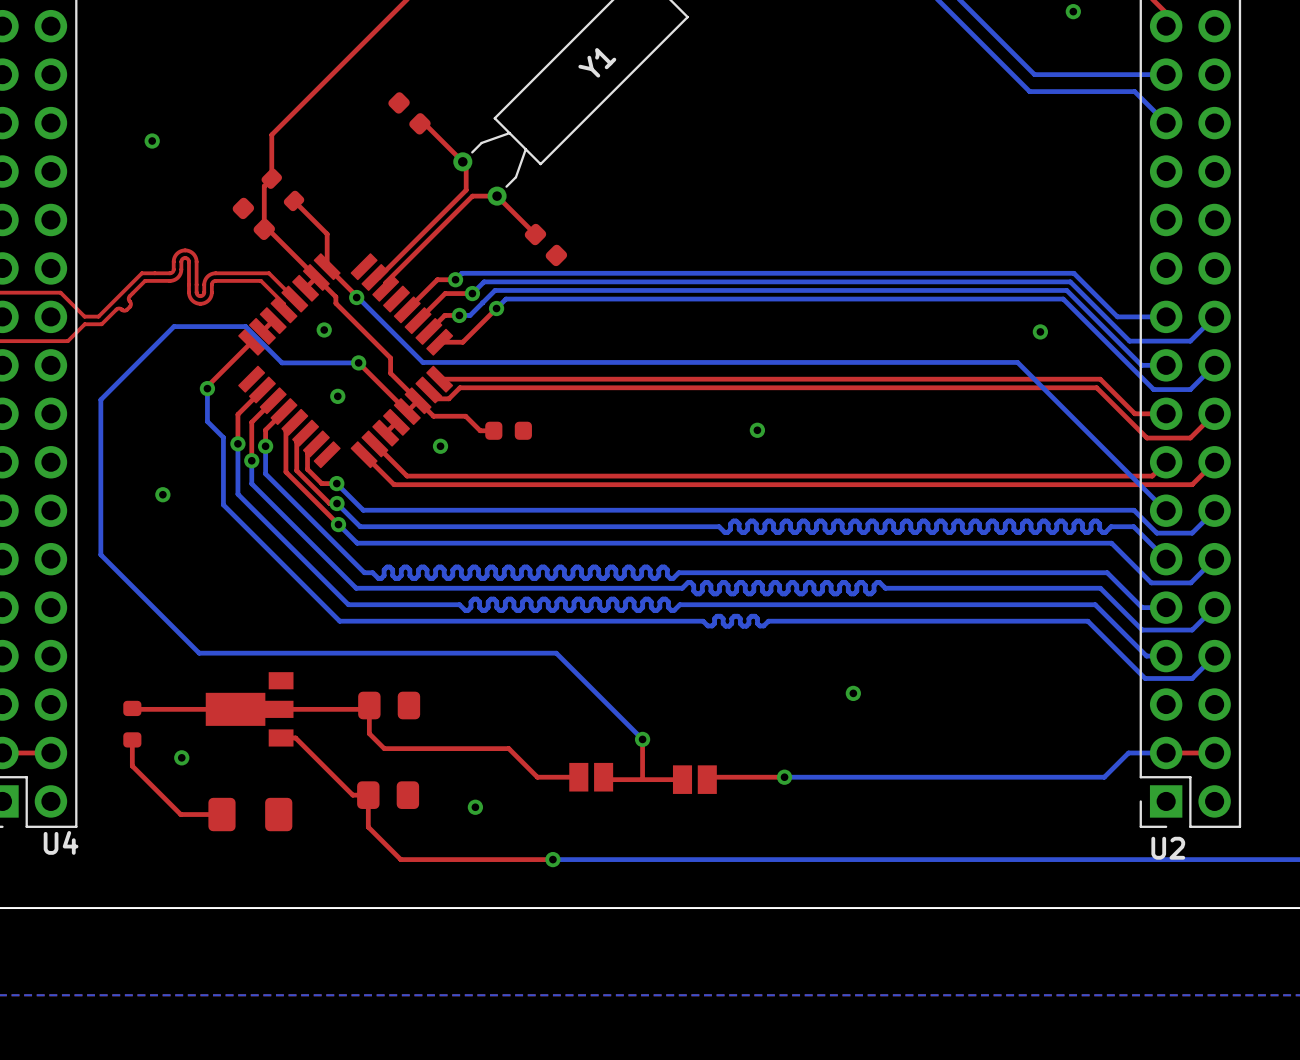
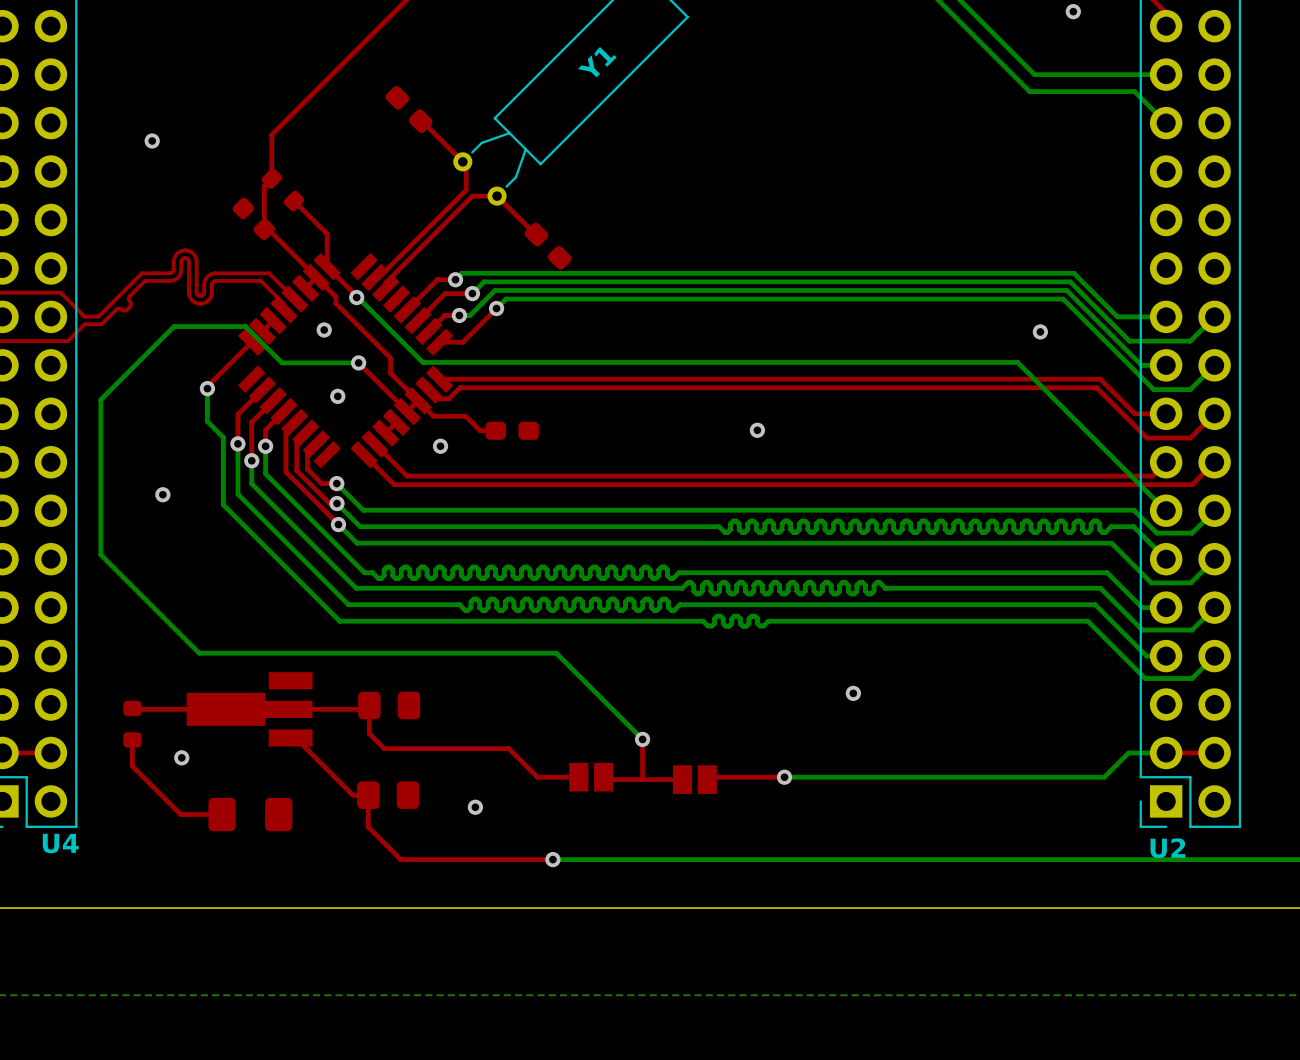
part footprint: [388, 92, 431, 135] -> [385, 86, 433, 133]
part footprint: [524, 223, 568, 267] -> [524, 222, 572, 270]
part footprint: [485, 421, 532, 440] -> [485, 421, 539, 440]
part footprint: [205, 672, 294, 747] -> [186, 672, 313, 747]

